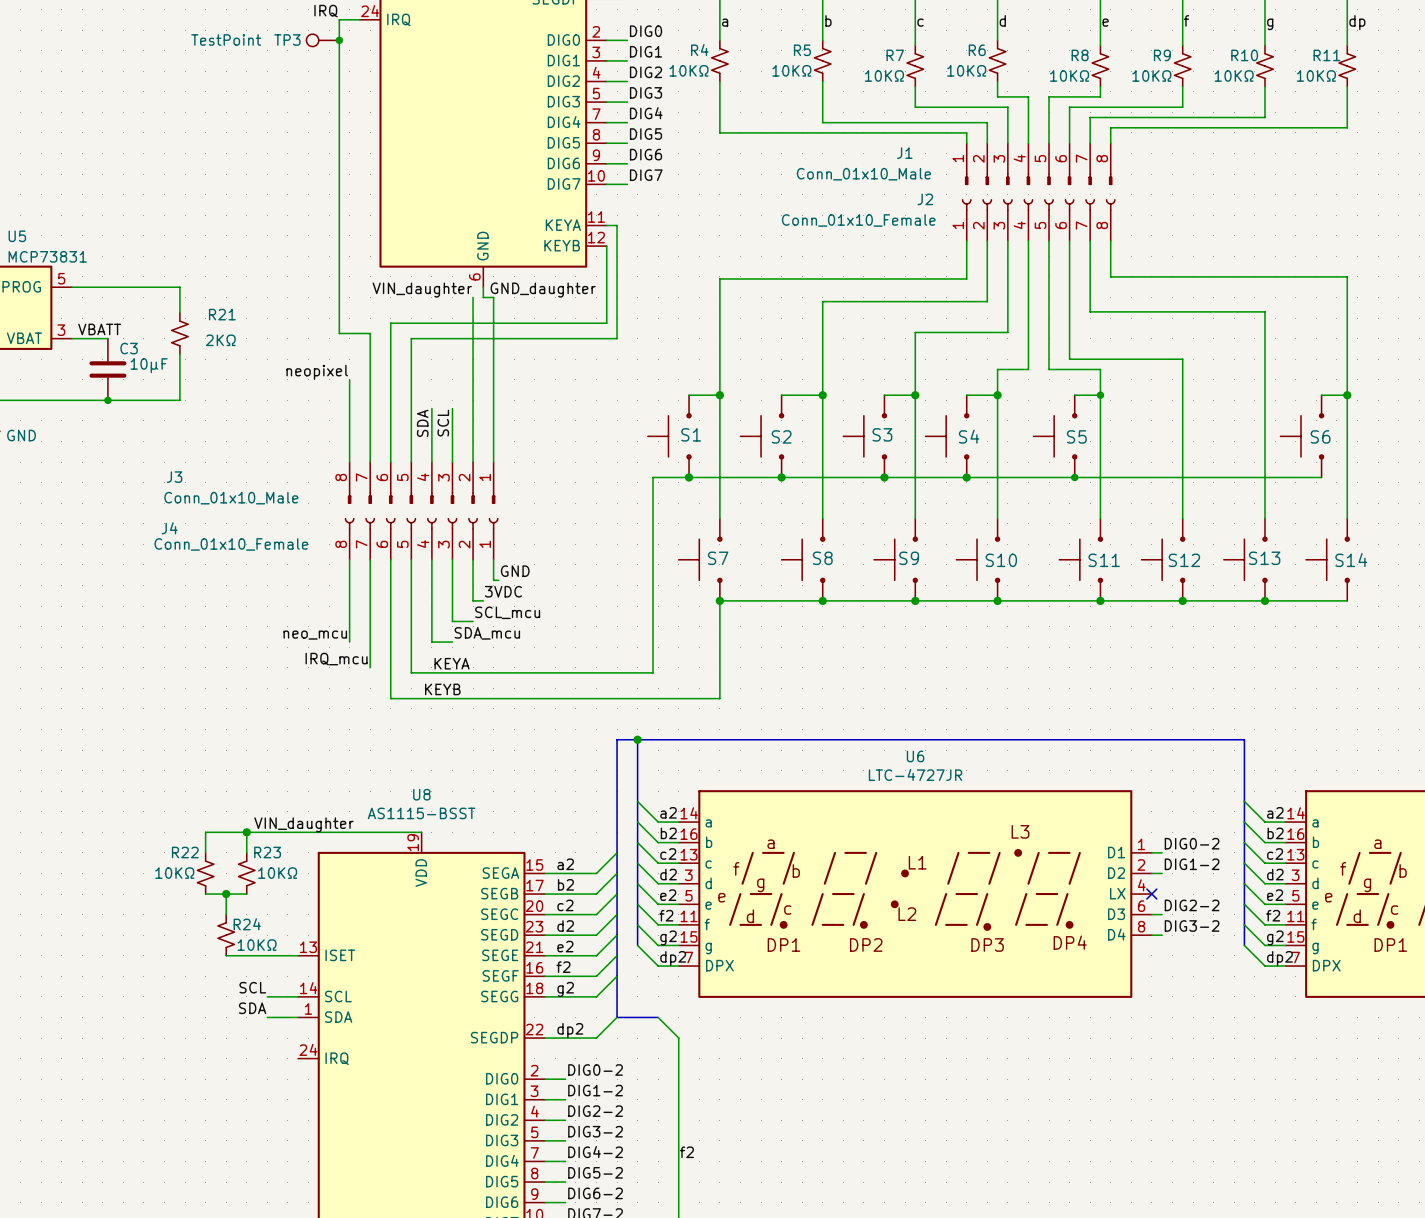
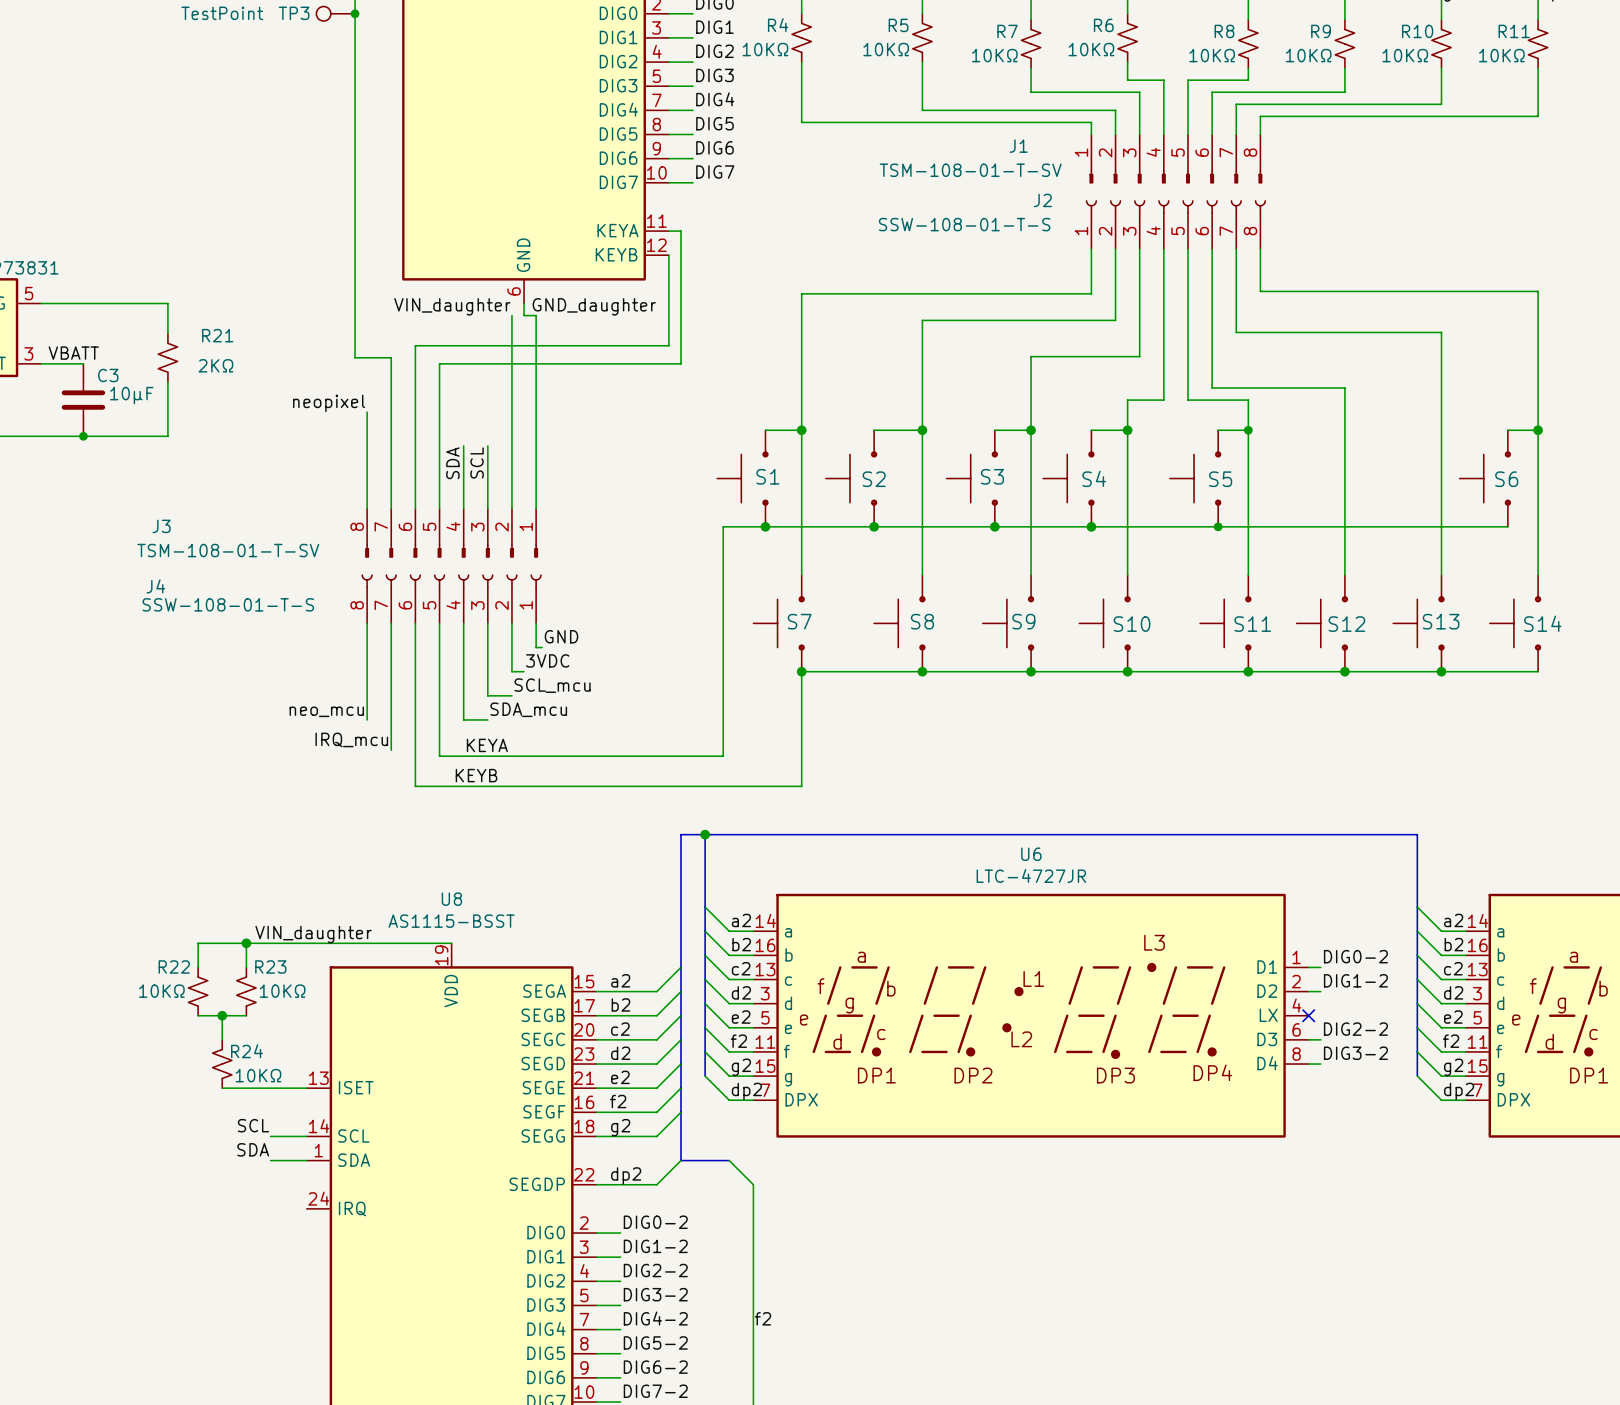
J1 value: Conn_01x10_Male (863, 174) -> TSM-108-01-T-SV (970, 170)
J2 value: Conn_01x10_Female (858, 220) -> SSW-108-01-T-S (964, 224)
J3 value: Conn_01x10_Male (231, 498) -> TSM-108-01-T-SV (228, 550)
J4 value: Conn_01x10_Female (231, 544) -> SSW-108-01-T-S (228, 604)

